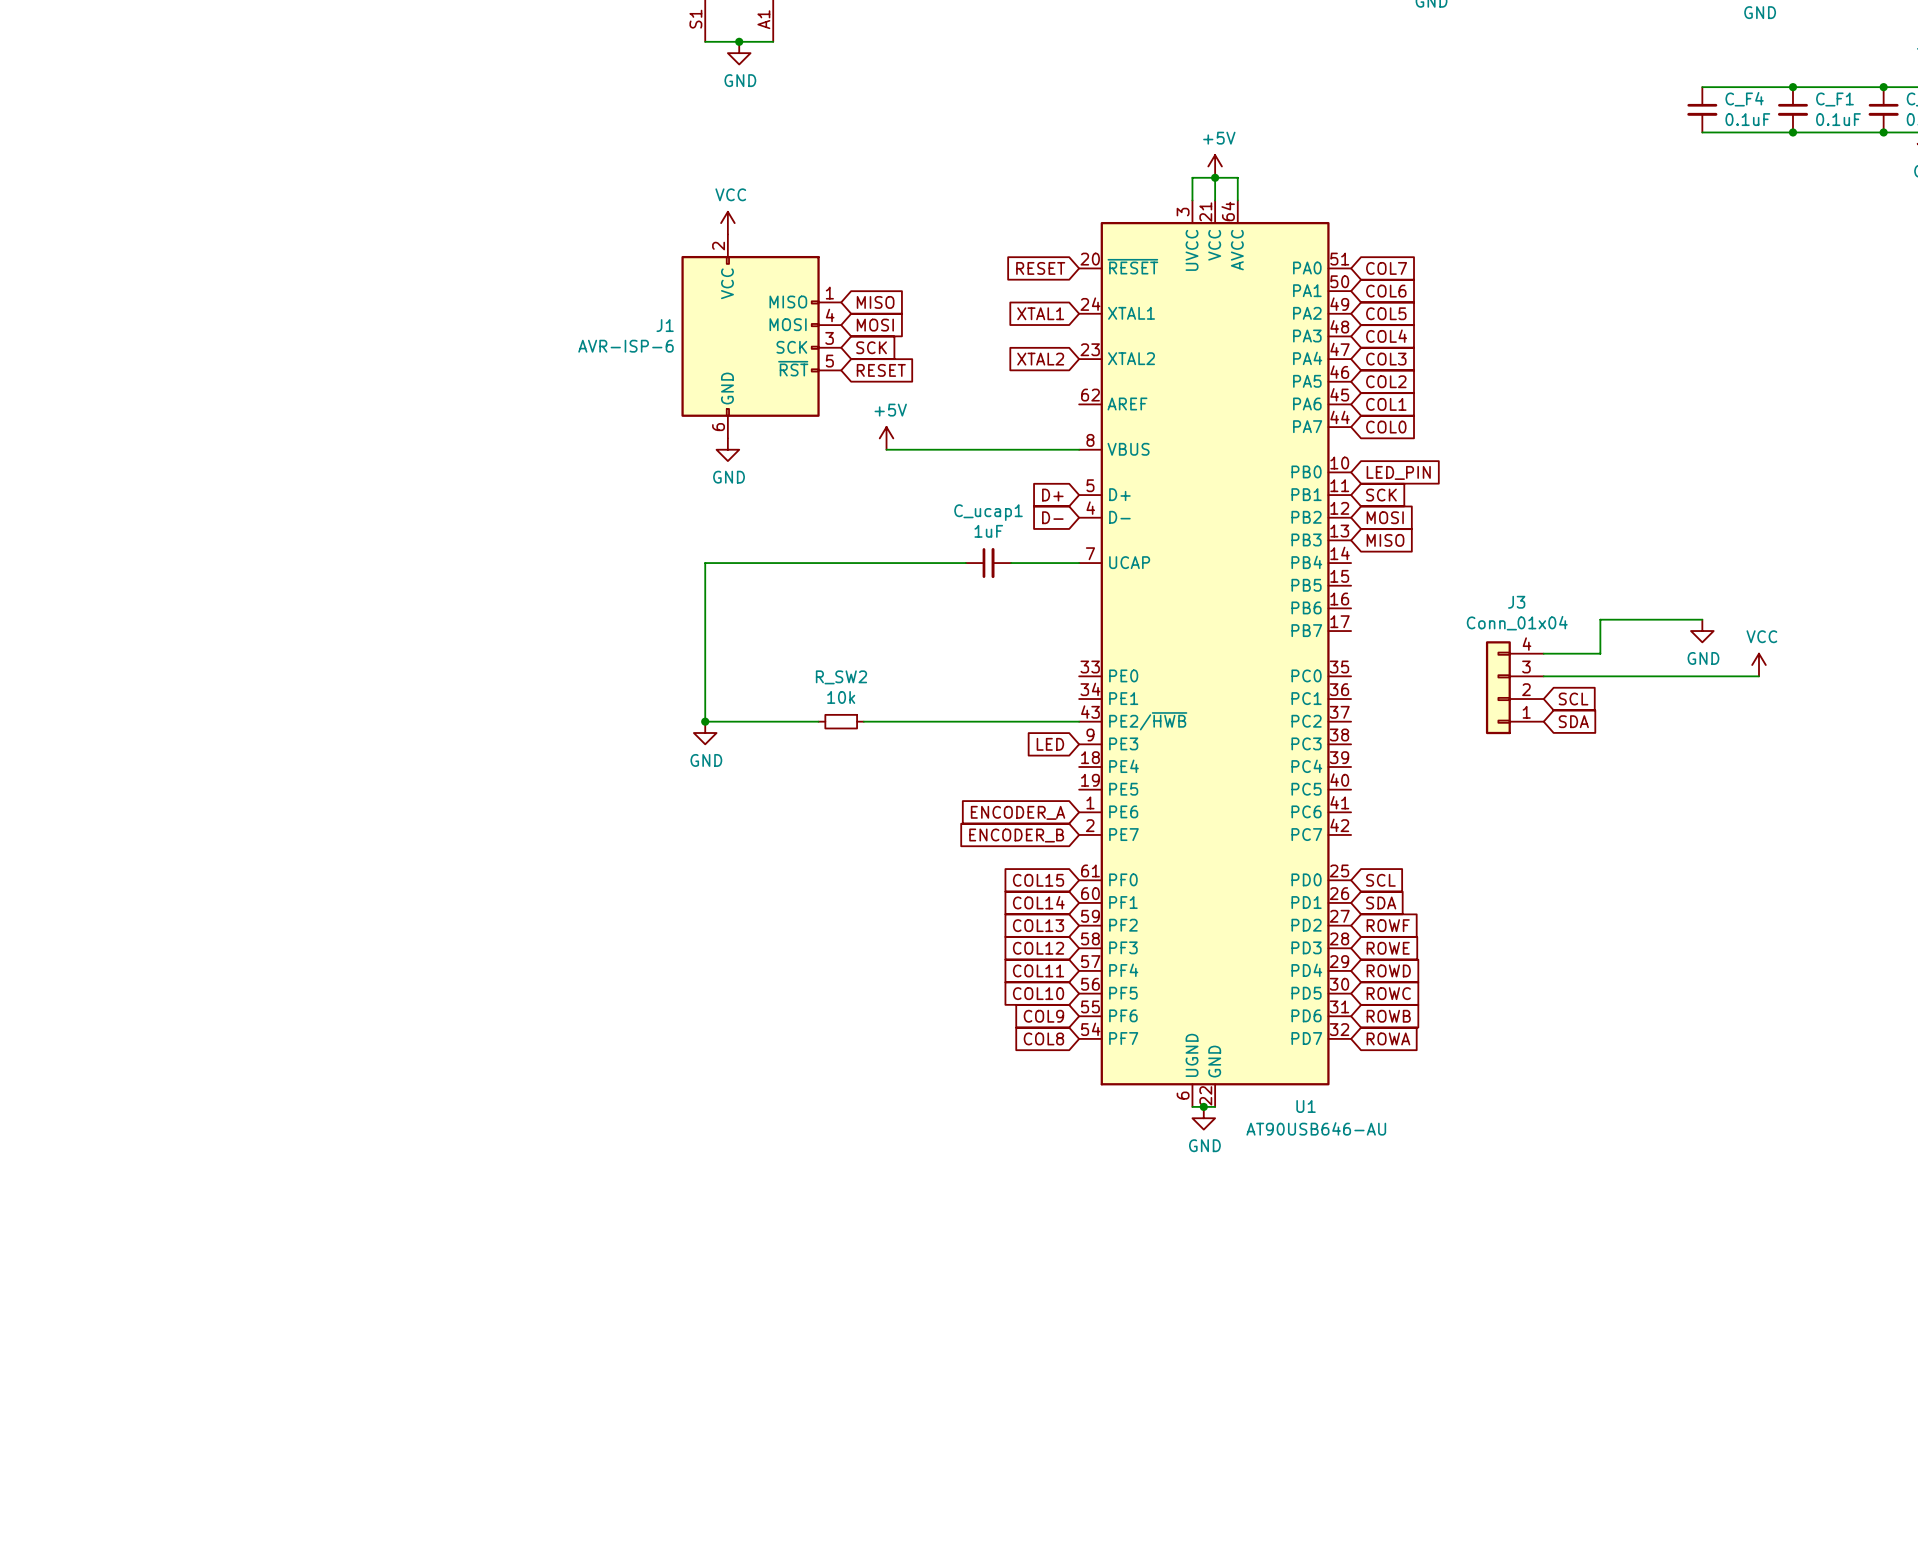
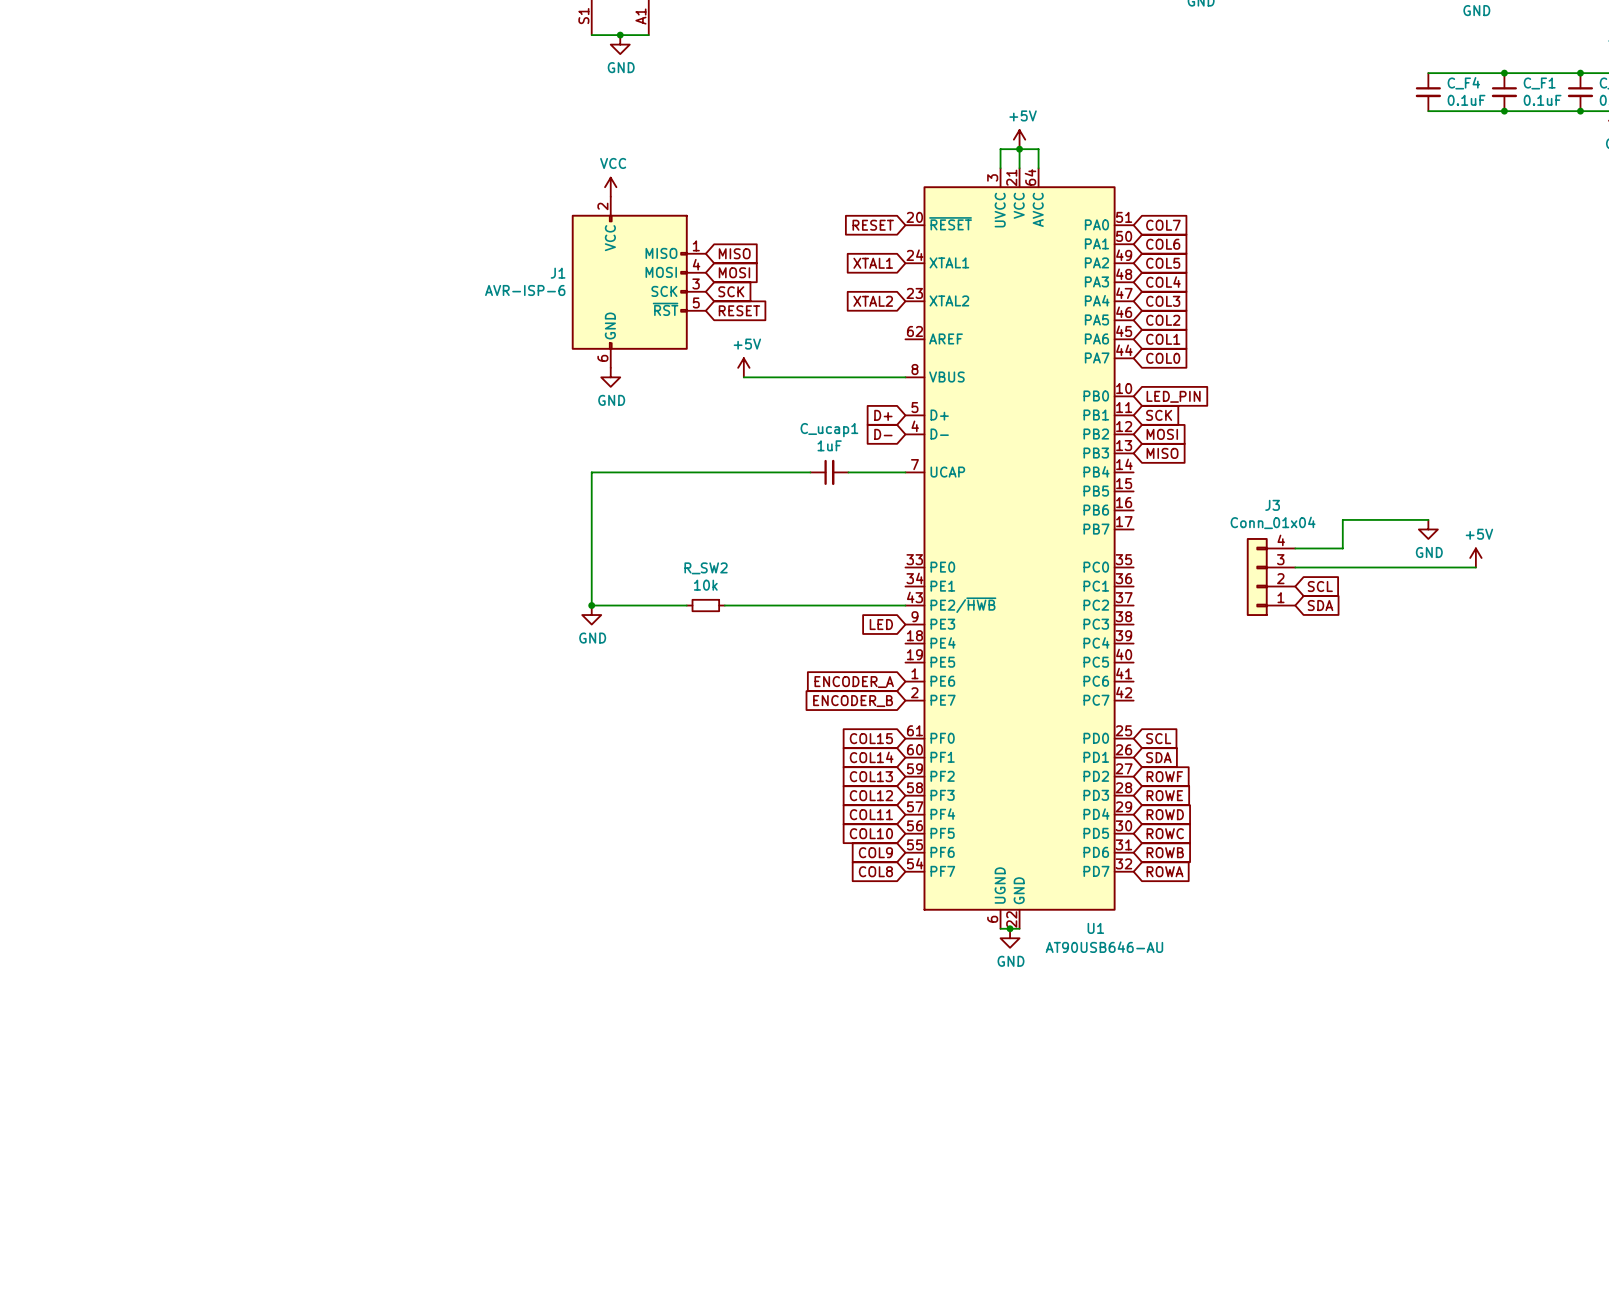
power symbol: VCC (1759, 665) -> +5V (1475, 557)

